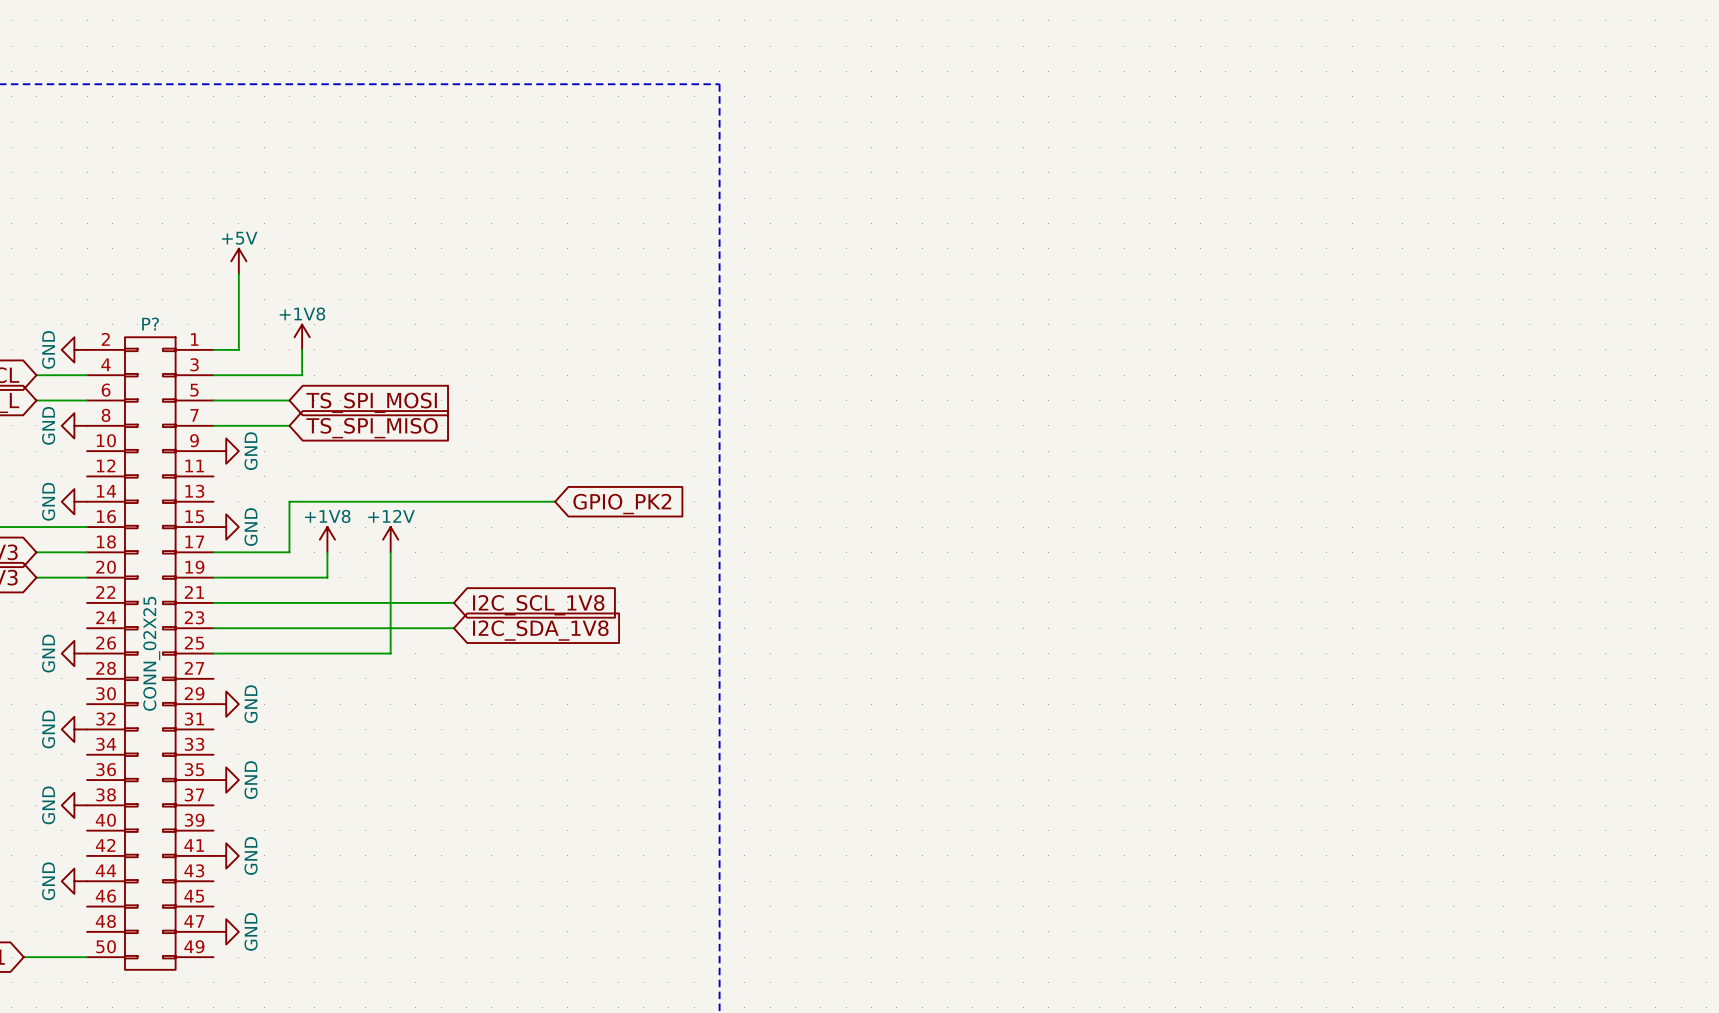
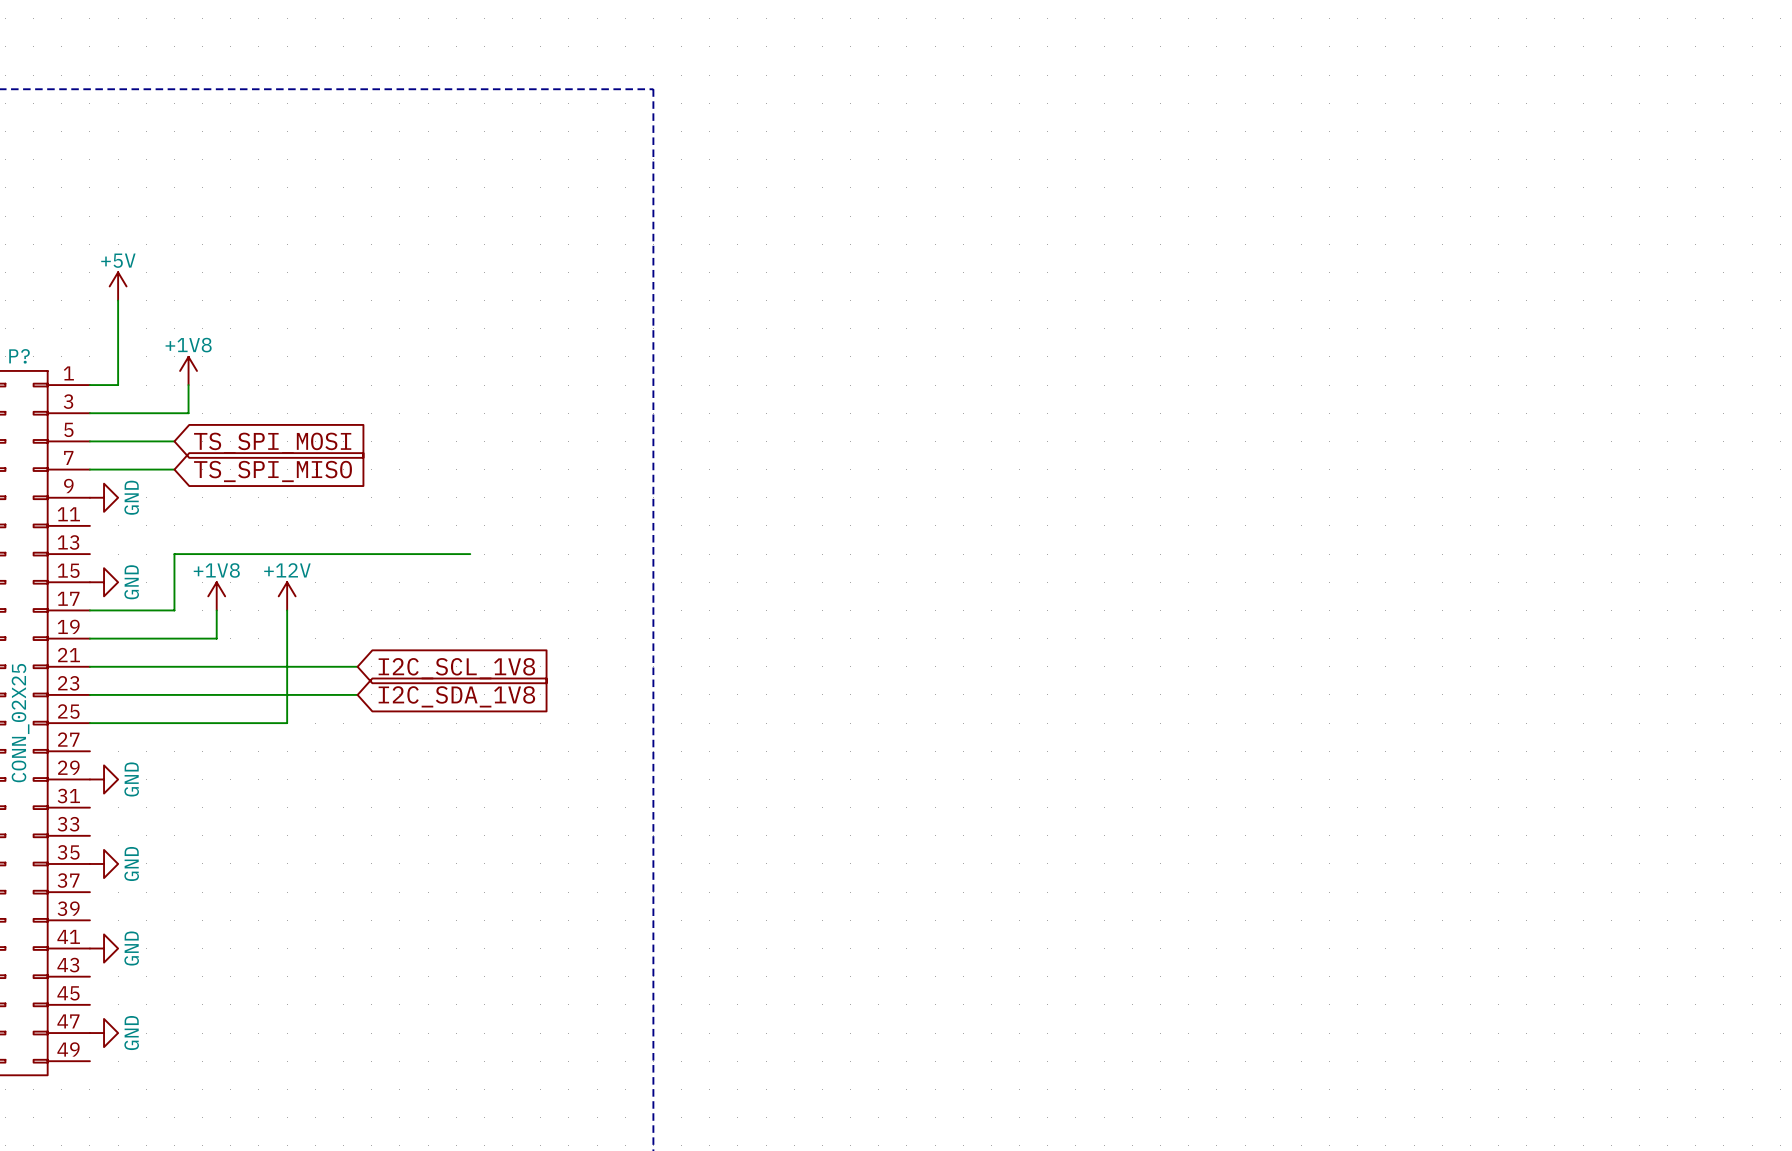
global label: GPIO_PK2 (622, 504) -> none

